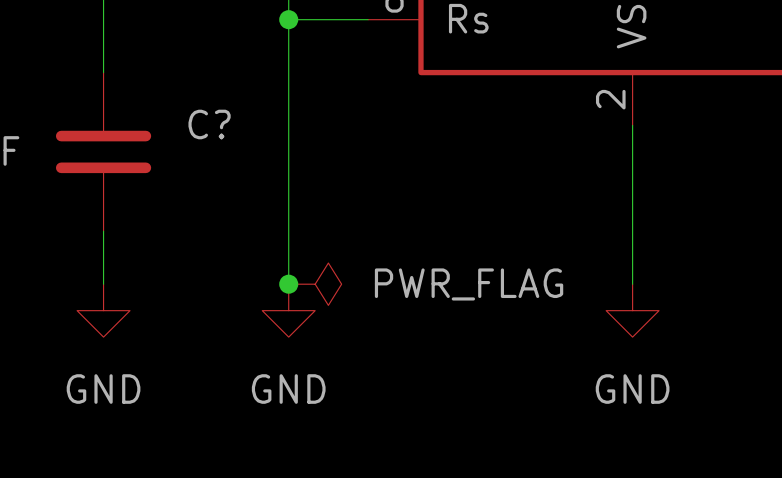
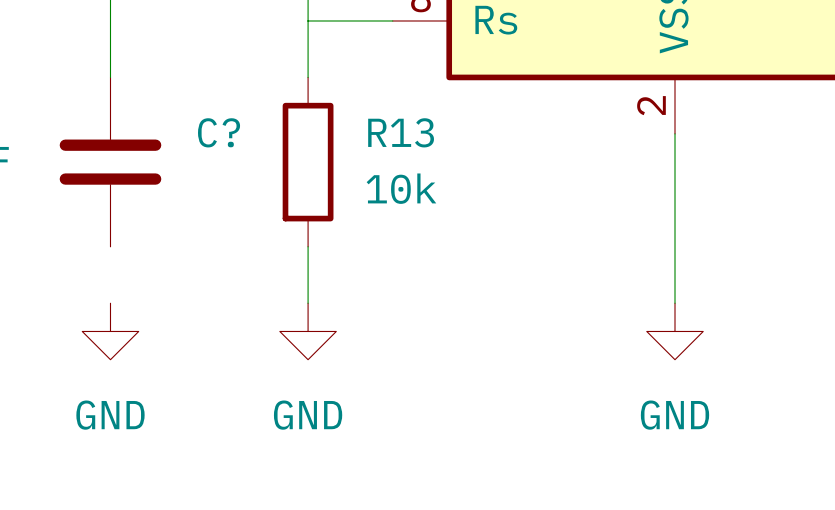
junction: (288, 19) -> none
wire: (288, 72) (288, 231) -> none
R13: none -> 10k (308, 162)
wire: (103, 231) (103, 284) -> none
junction: (288, 284) -> none
power symbol: PWR_FLAG (315, 284) -> none

